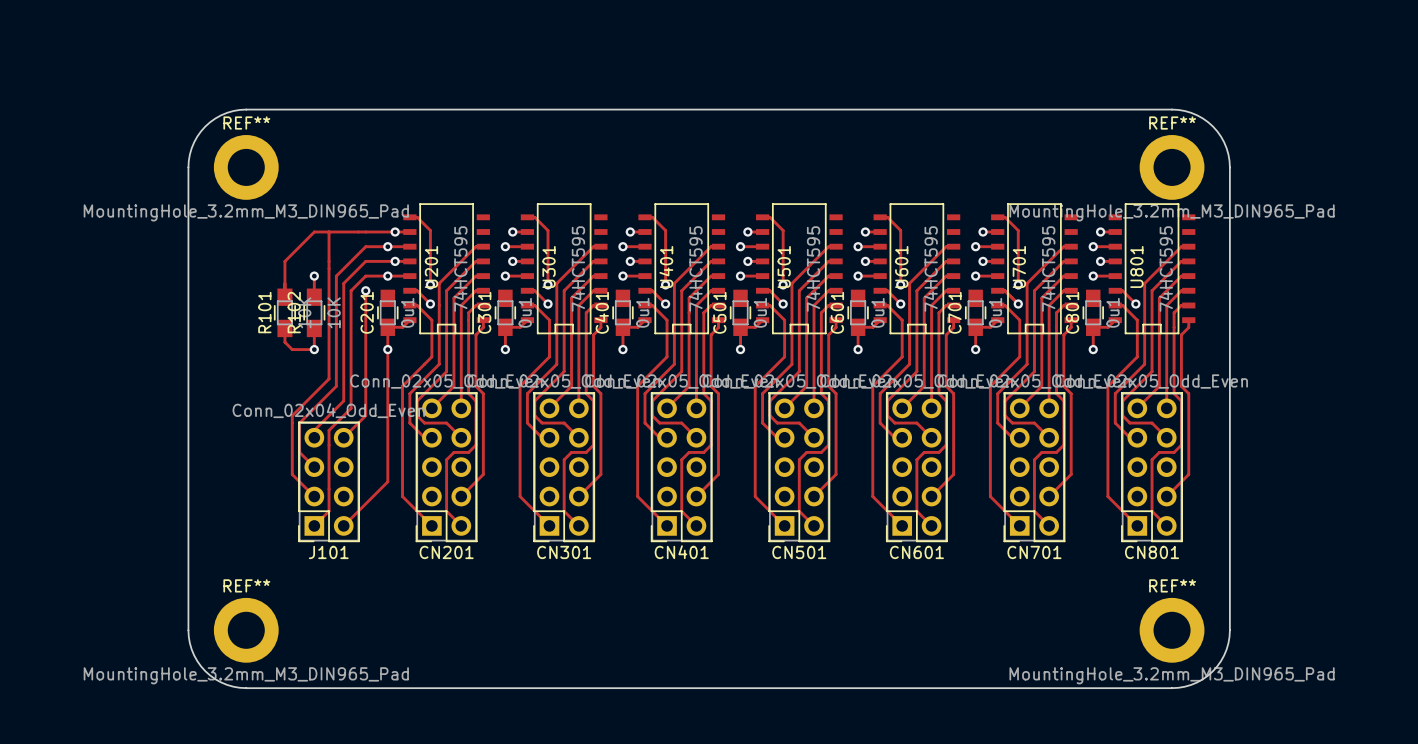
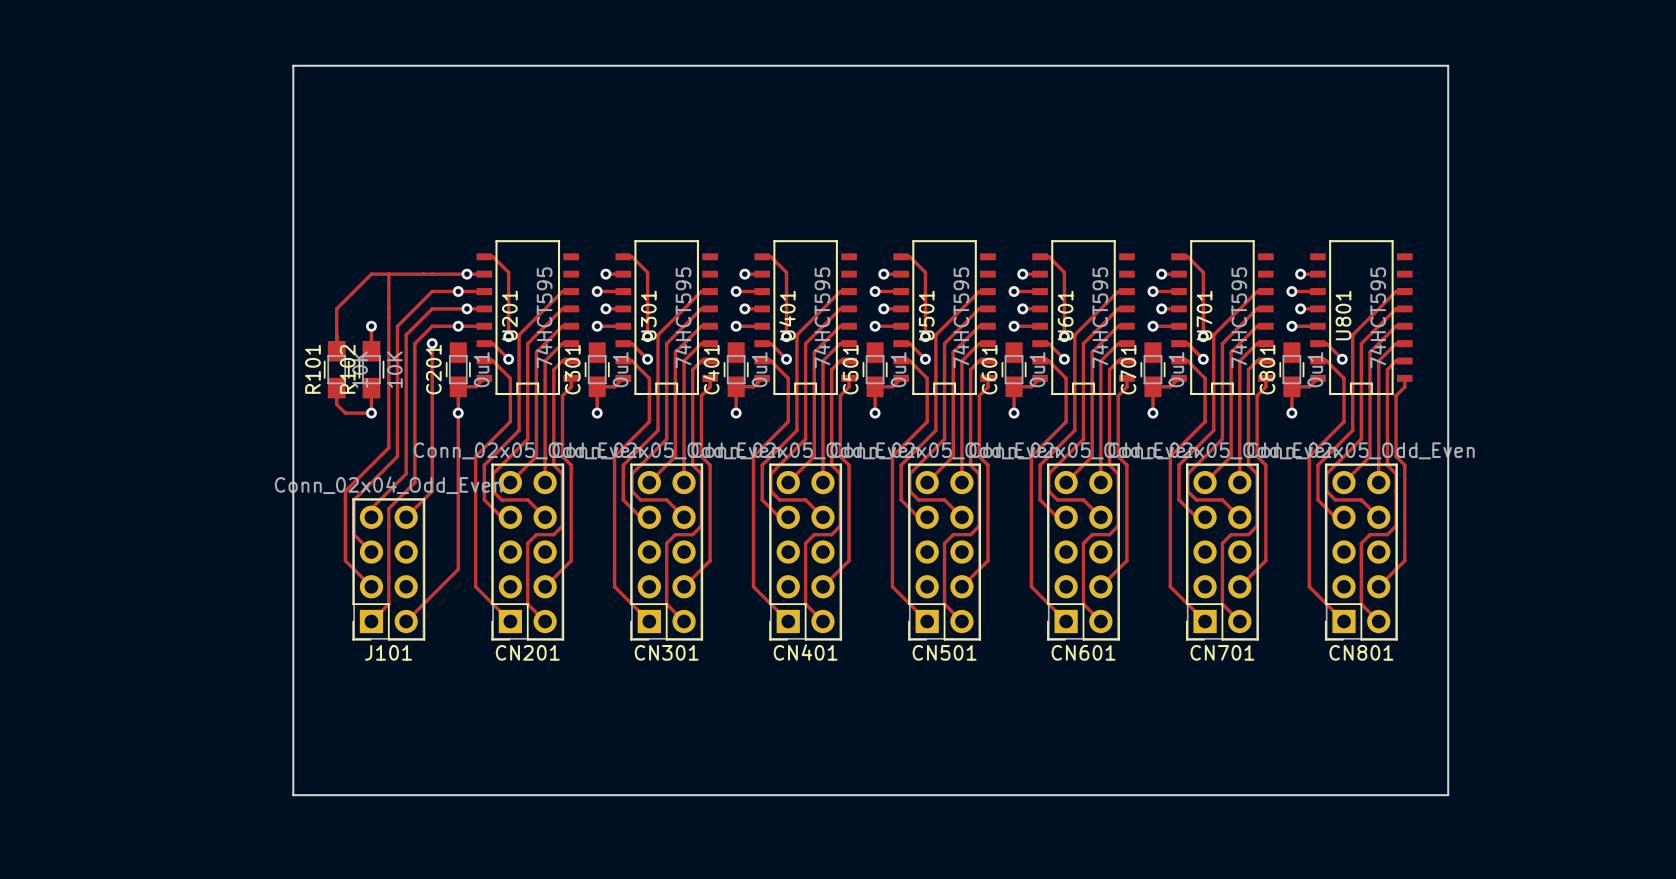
board edge: (246, 109) (1172, 109) (1184, 111) (1202, 118) (1221, 136) (1228, 154) (1229, 167) (1229, 630) (1228, 643) (1221, 661) (1202, 679) (1184, 686) (1172, 688) (246, 688) (233, 686) (215, 679) (205, 671) (194, 655) (188, 630) (188, 167) (191, 148) (205, 126) (227, 112) (246, 109) -> (293, 65) (293, 795) (1448, 795) (1448, 65) (293, 65)
REF**: MountingHole_3.2mm_M3_DIN965_Pad (246, 167) -> none
REF**: MountingHole_3.2mm_M3_DIN965_Pad (1172, 167) -> none
REF**: MountingHole_3.2mm_M3_DIN965_Pad (246, 630) -> none
REF**: MountingHole_3.2mm_M3_DIN965_Pad (1172, 630) -> none

